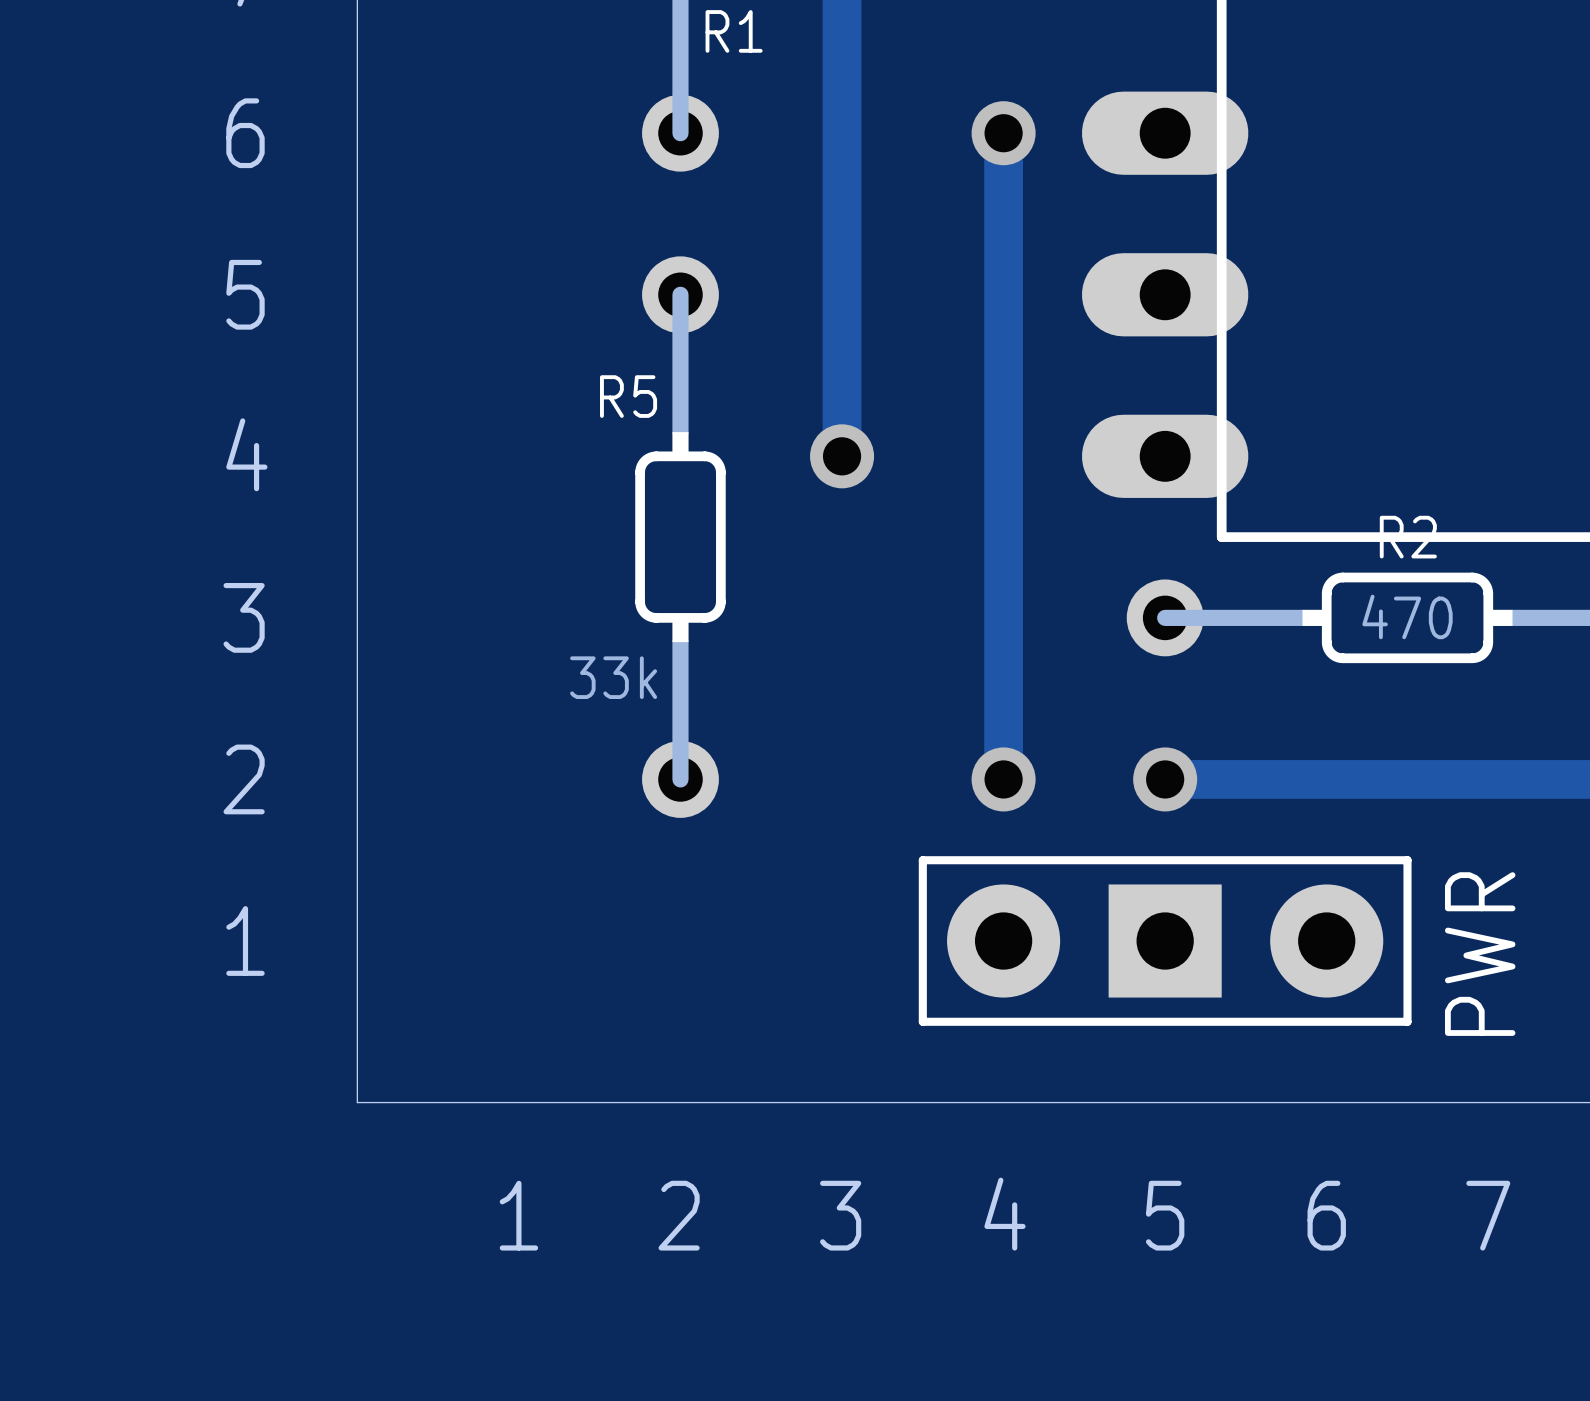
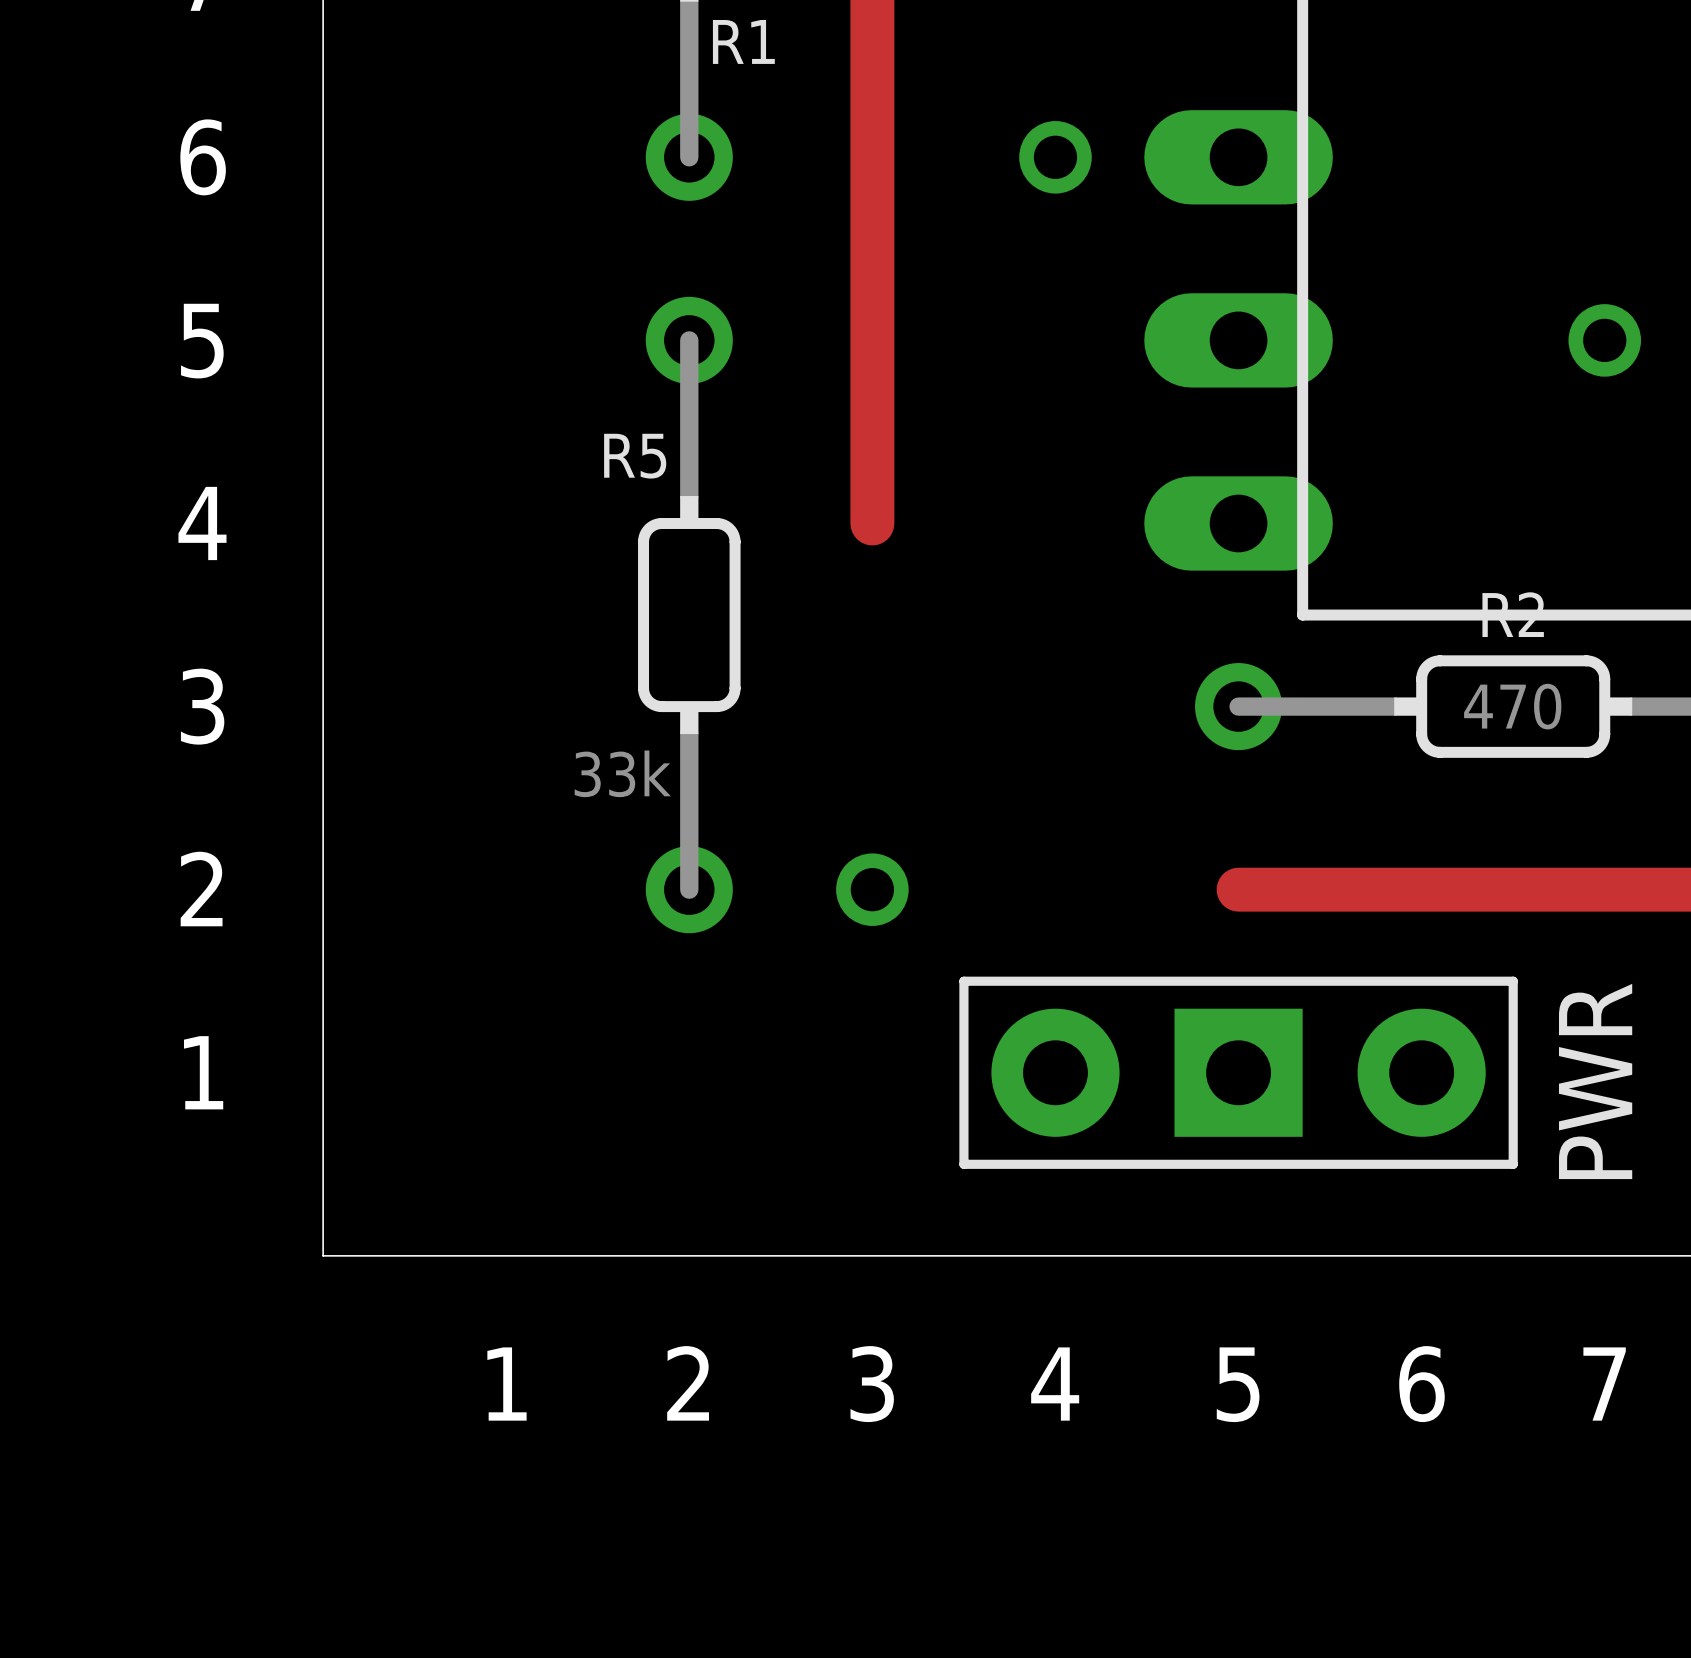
track: (1003, 133) (1003, 779) -> none
via: none -> (1604, 340)
via: (842, 456) -> none
via: none -> (872, 889)
via: (1003, 779) -> none
via: (1165, 779) -> none

